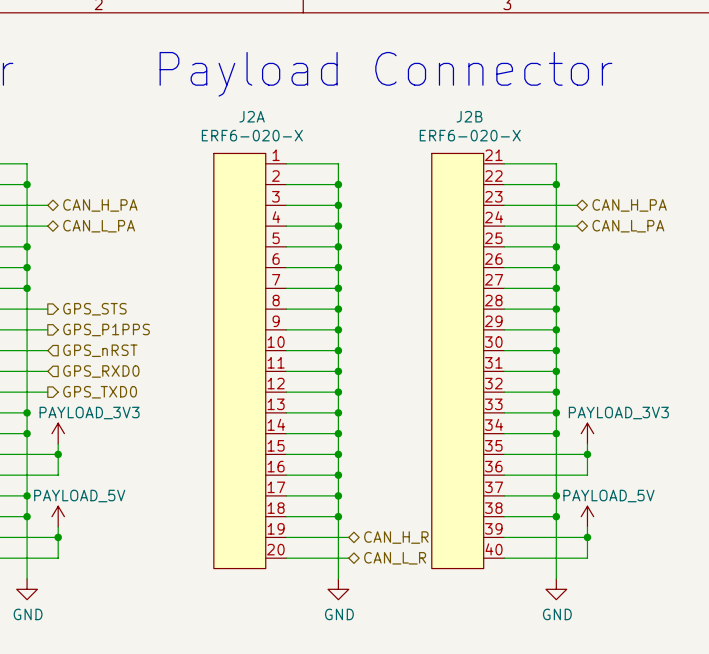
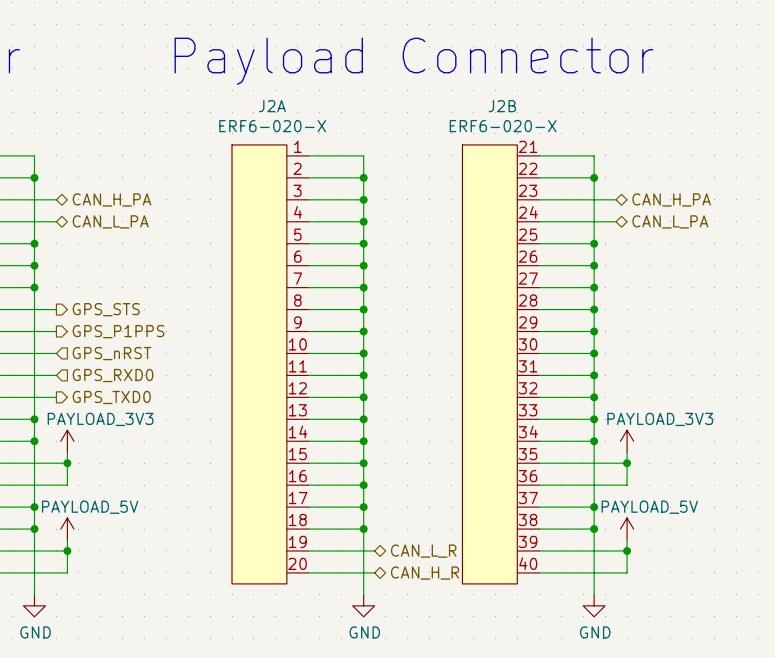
hierarchical label: CAN_H_R (396, 537) -> CAN_L_R (423, 551)
hierarchical label: CAN_L_R (395, 558) -> CAN_H_R (425, 573)

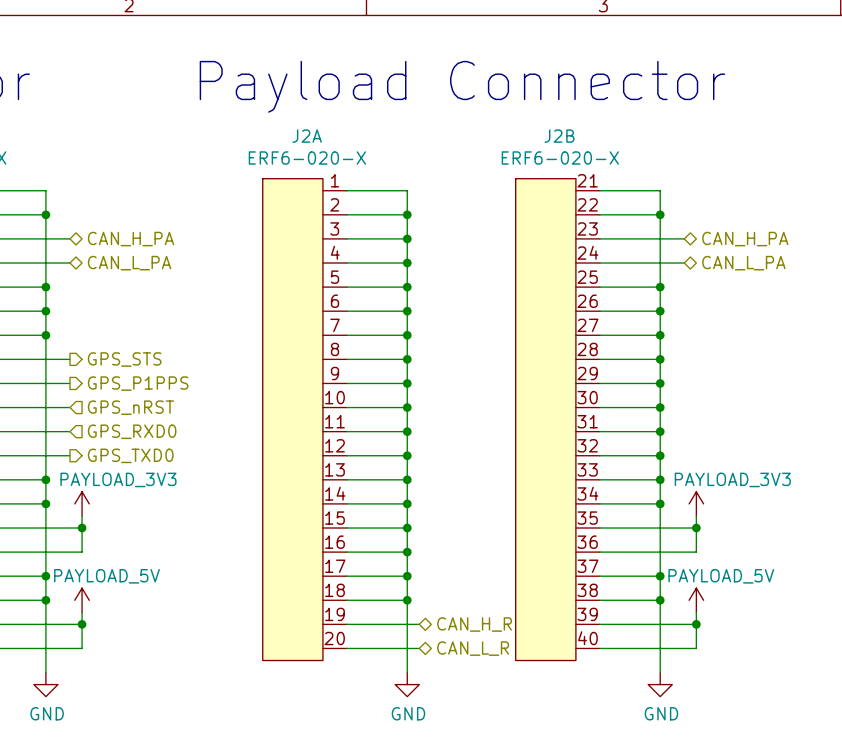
hierarchical label: CAN_L_R (423, 551) -> CAN_H_R (474, 624)
hierarchical label: CAN_H_R (425, 573) -> CAN_L_R (473, 648)

